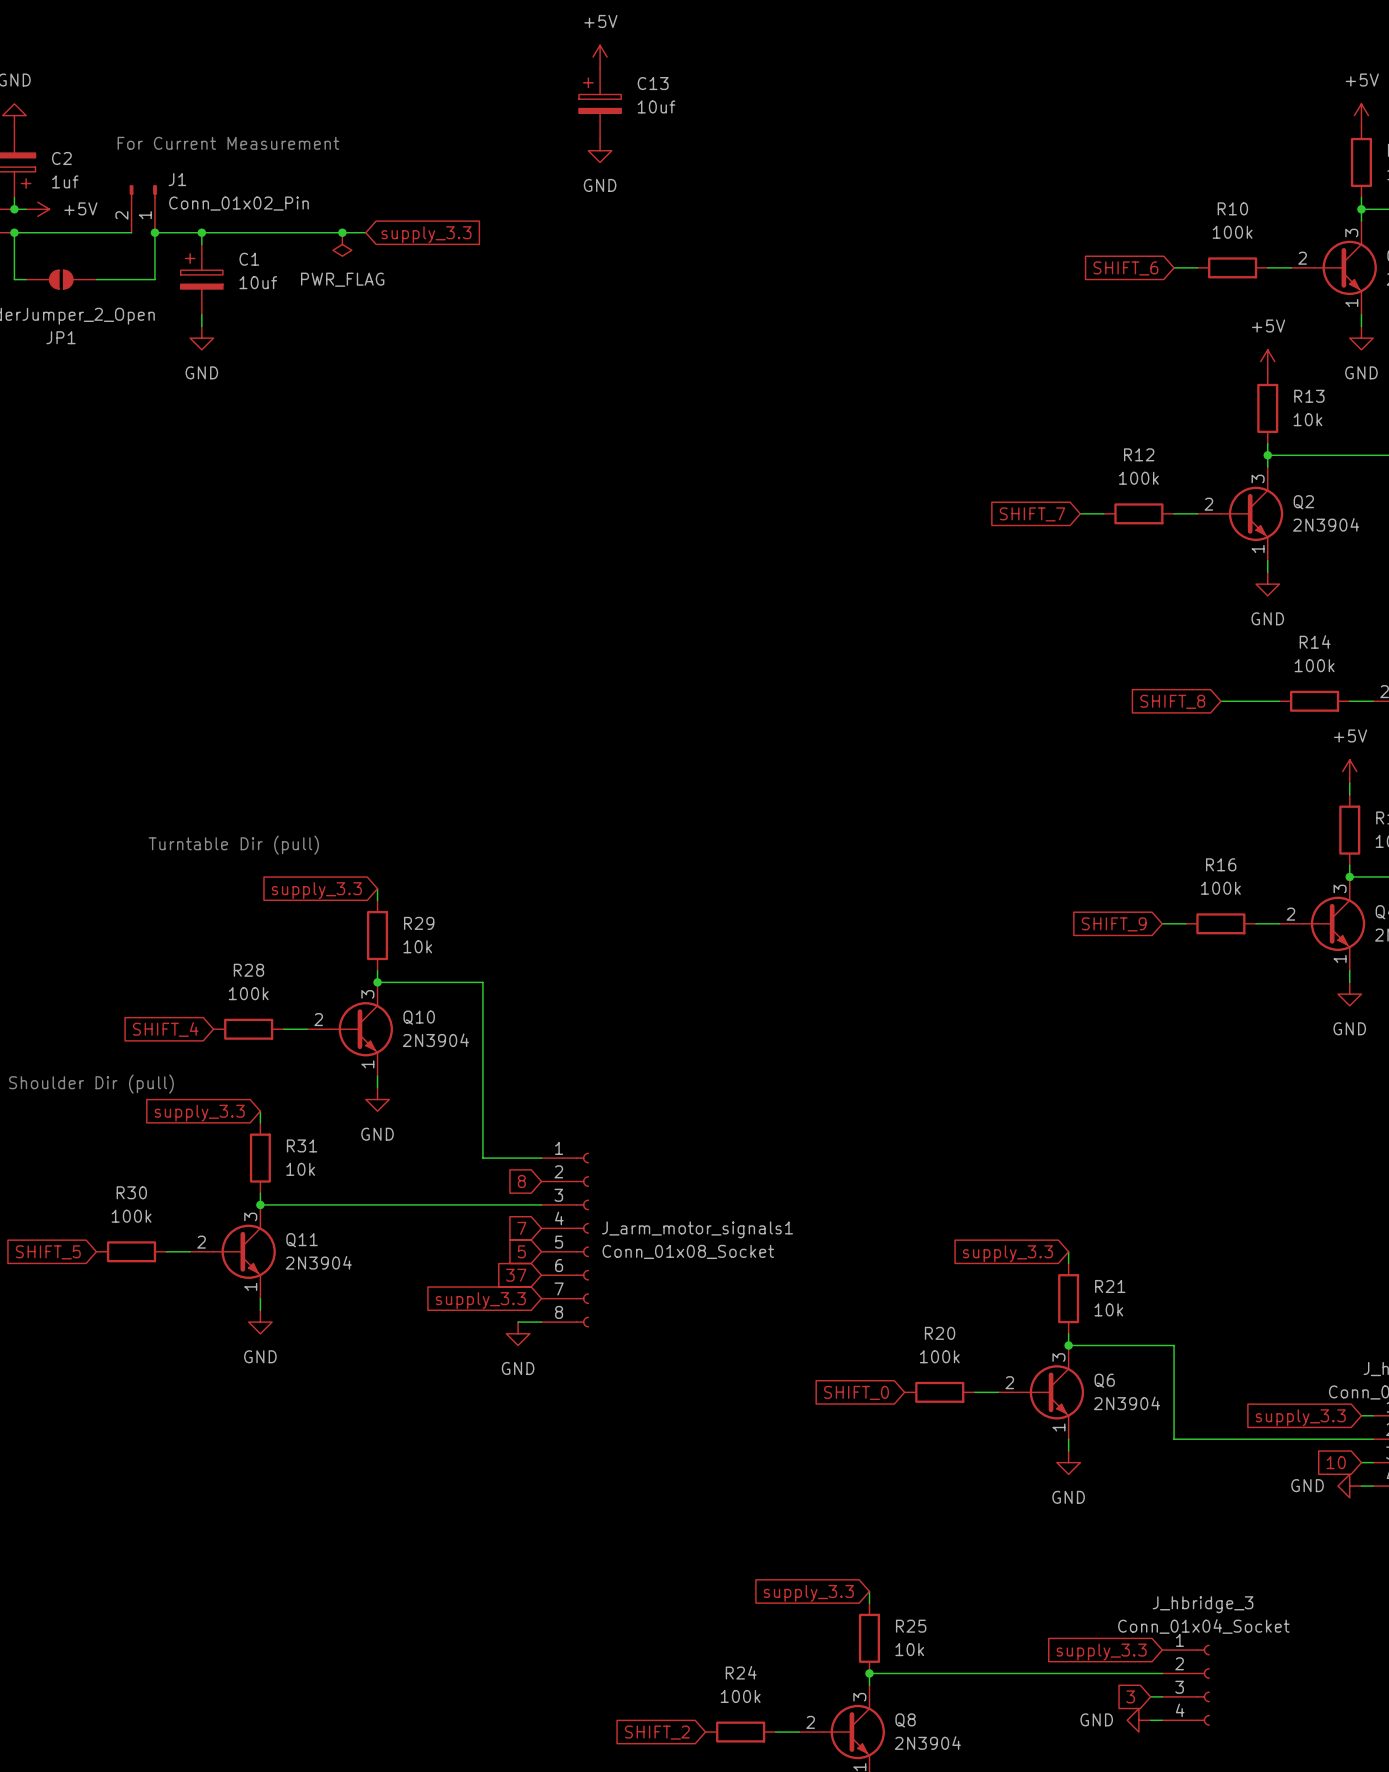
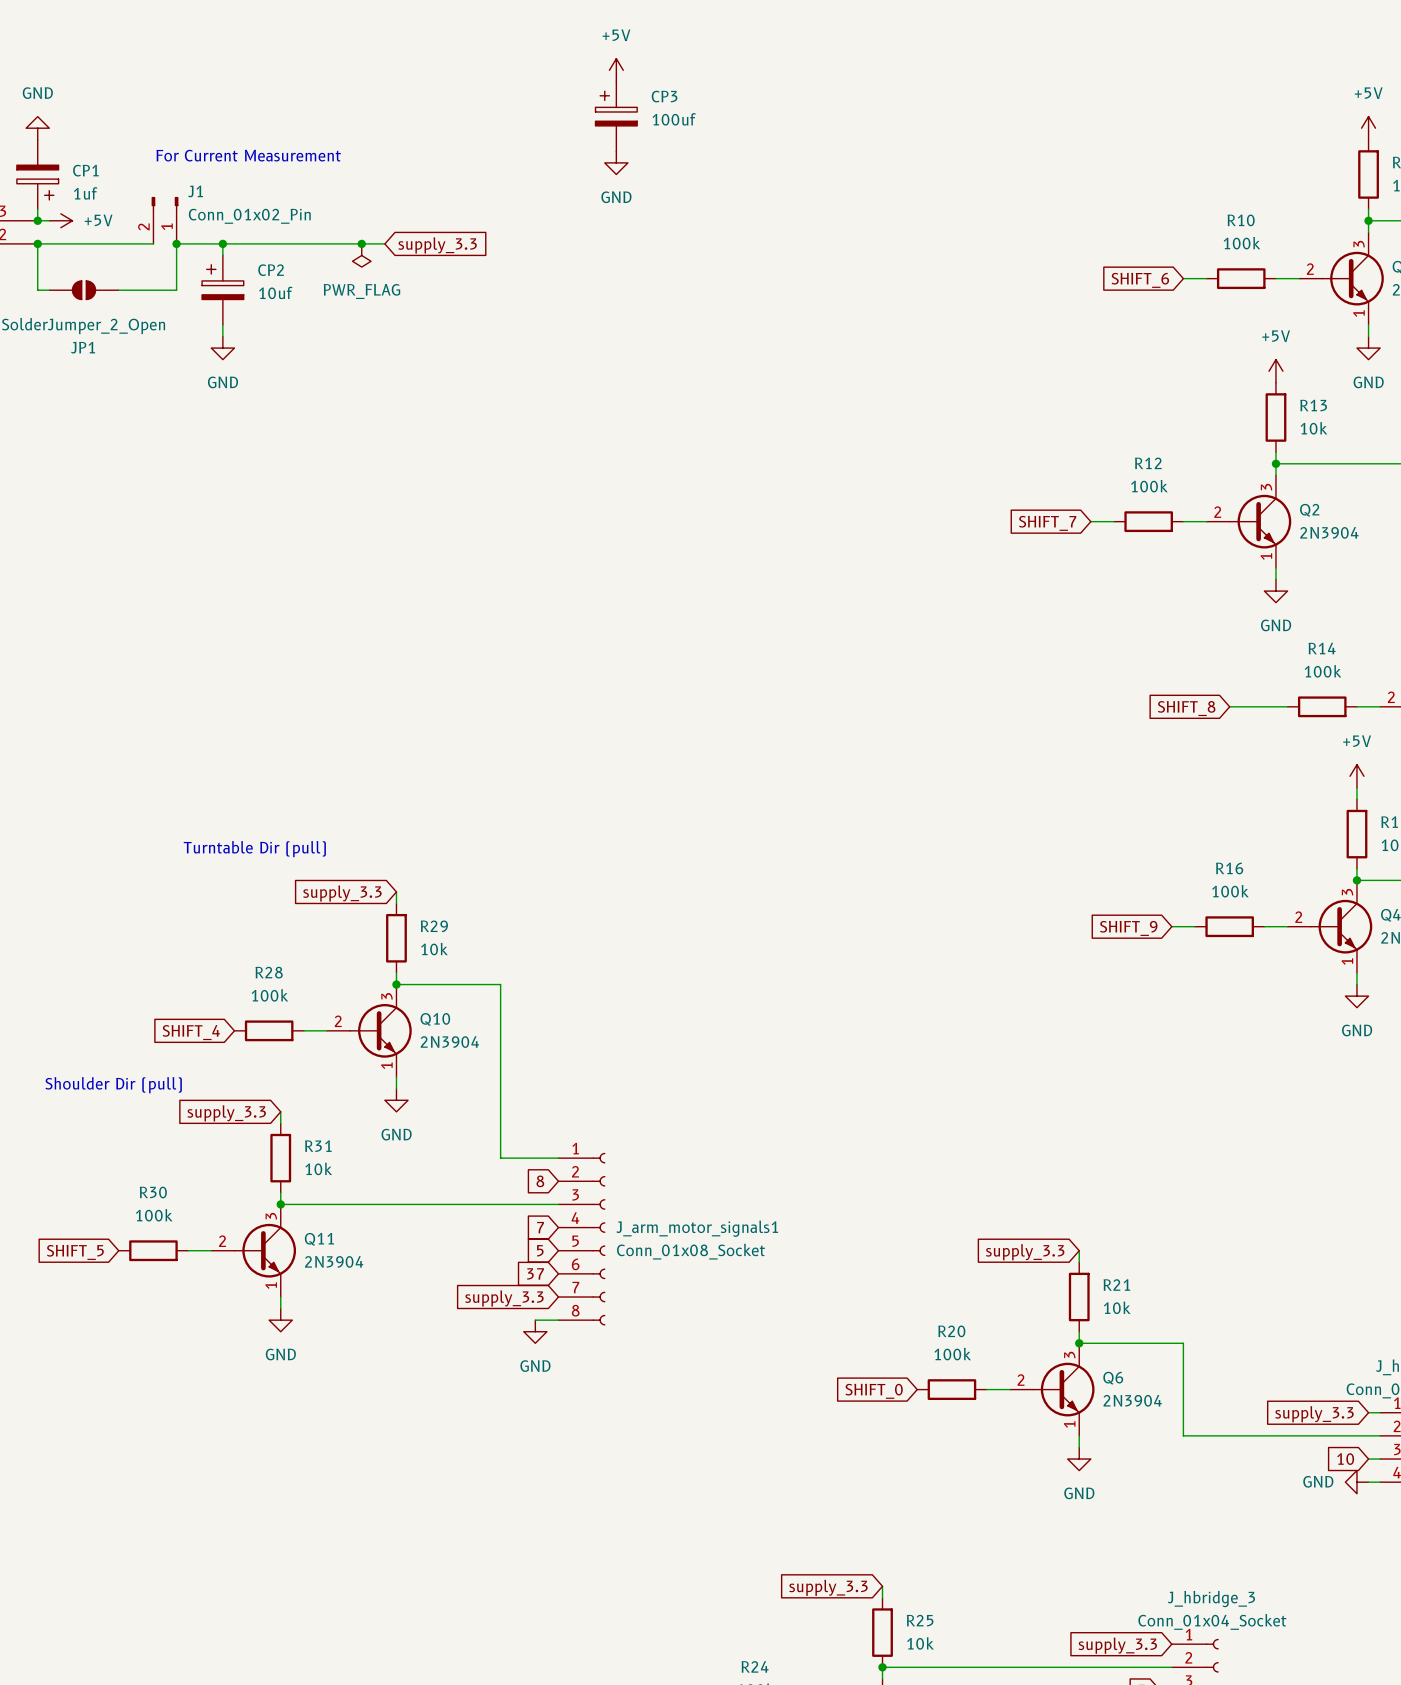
C13 name: C13 (653, 83) -> CP3 (664, 96)
C13 value: 10uf (656, 106) -> 100uf (674, 119)
C2 name: C2 (61, 158) -> CP1 (85, 170)
C1 name: C1 (249, 259) -> CP2 (271, 270)

